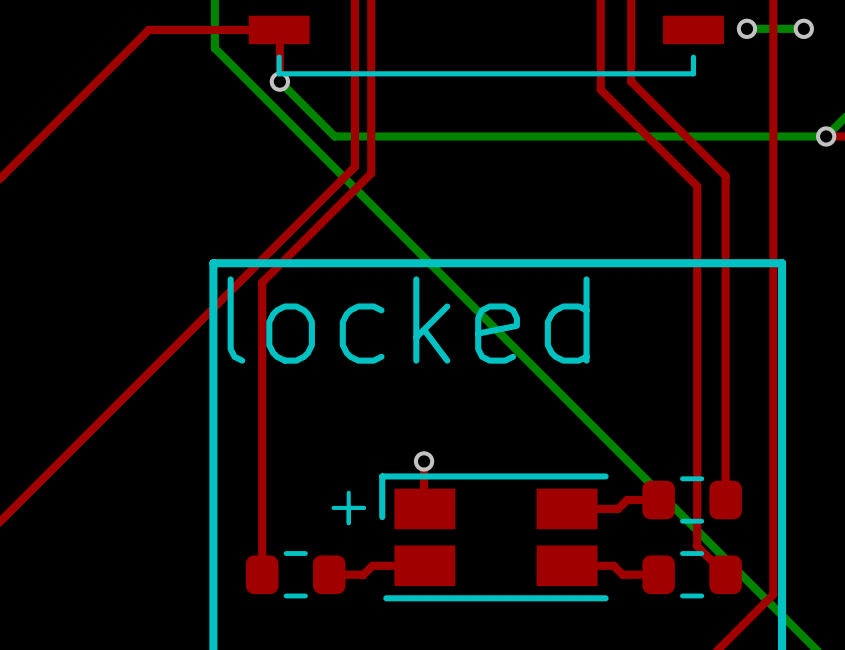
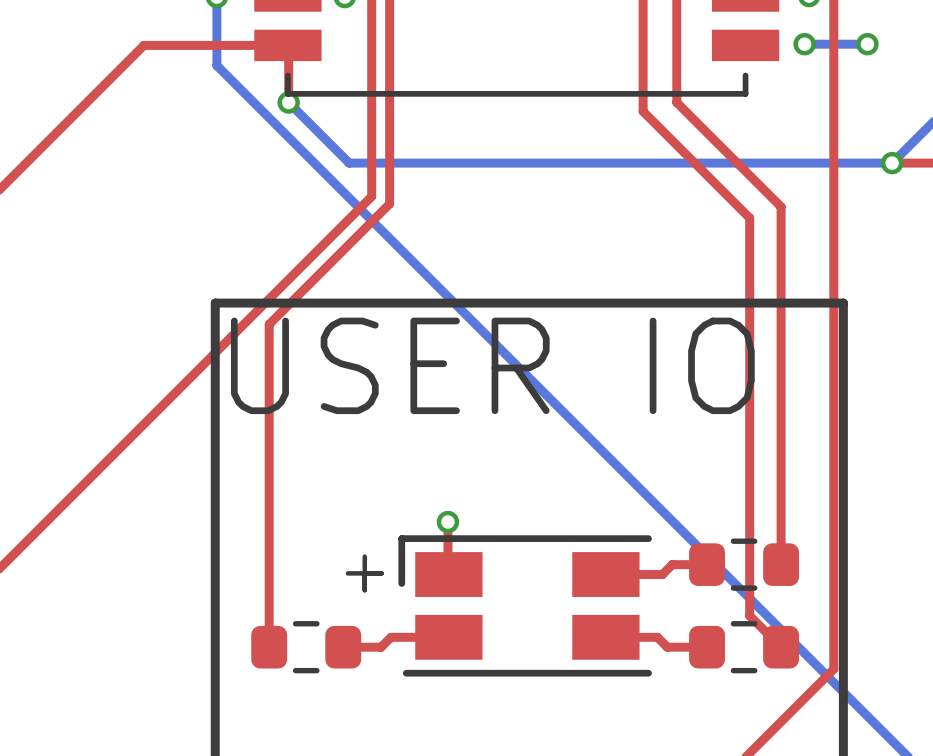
text: locked (408, 320) -> USER IO (492, 365)

